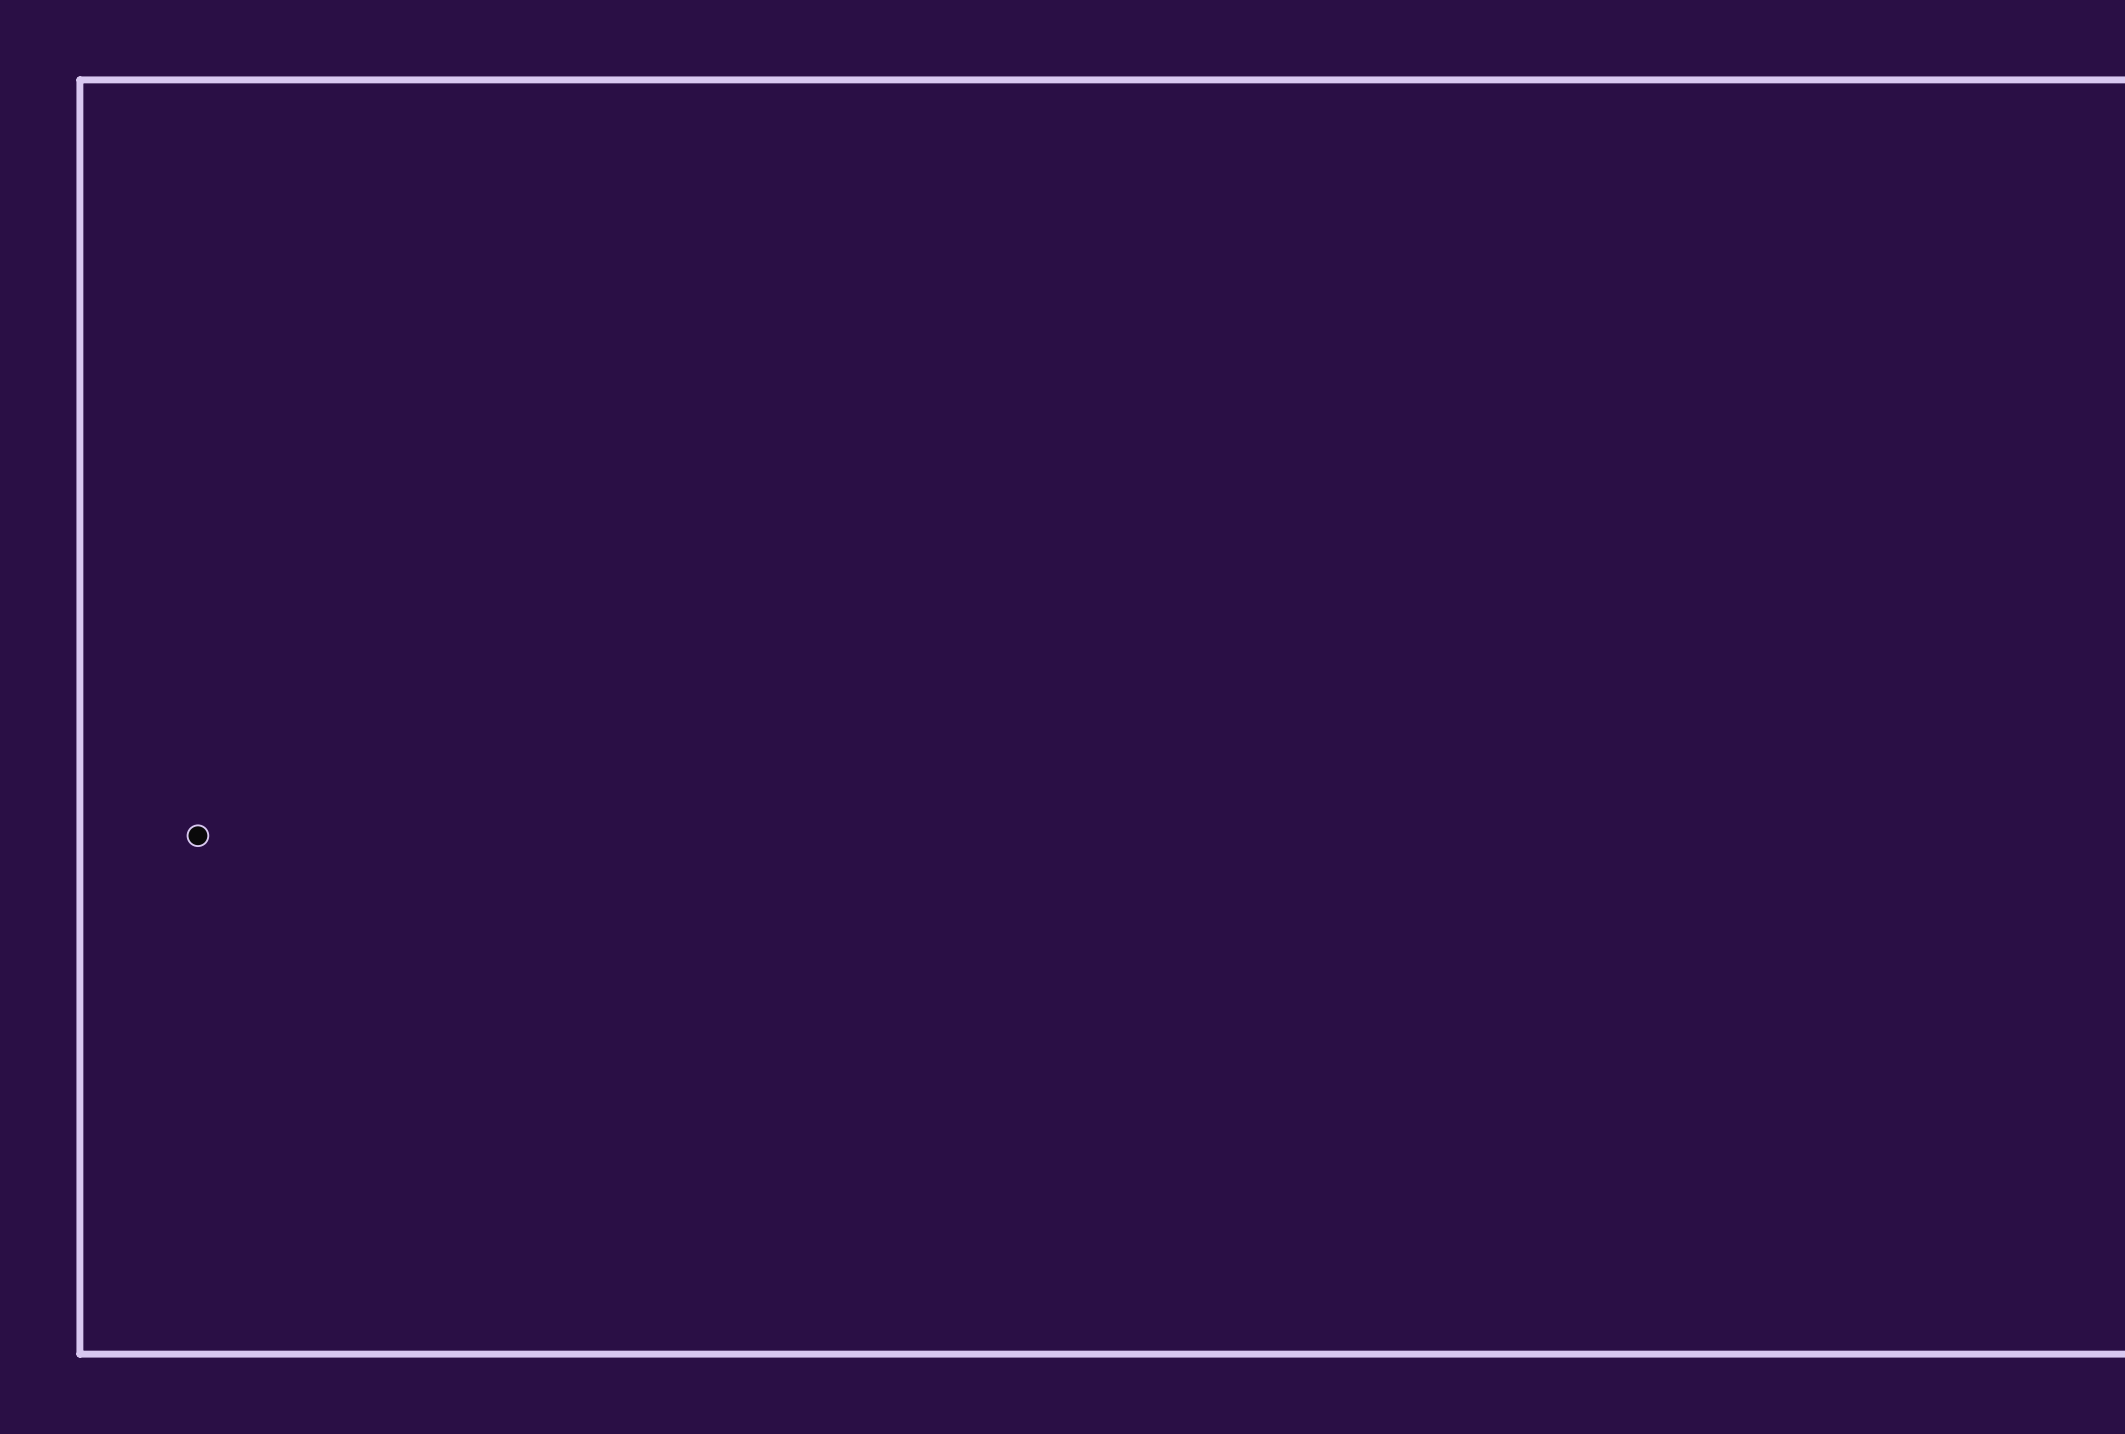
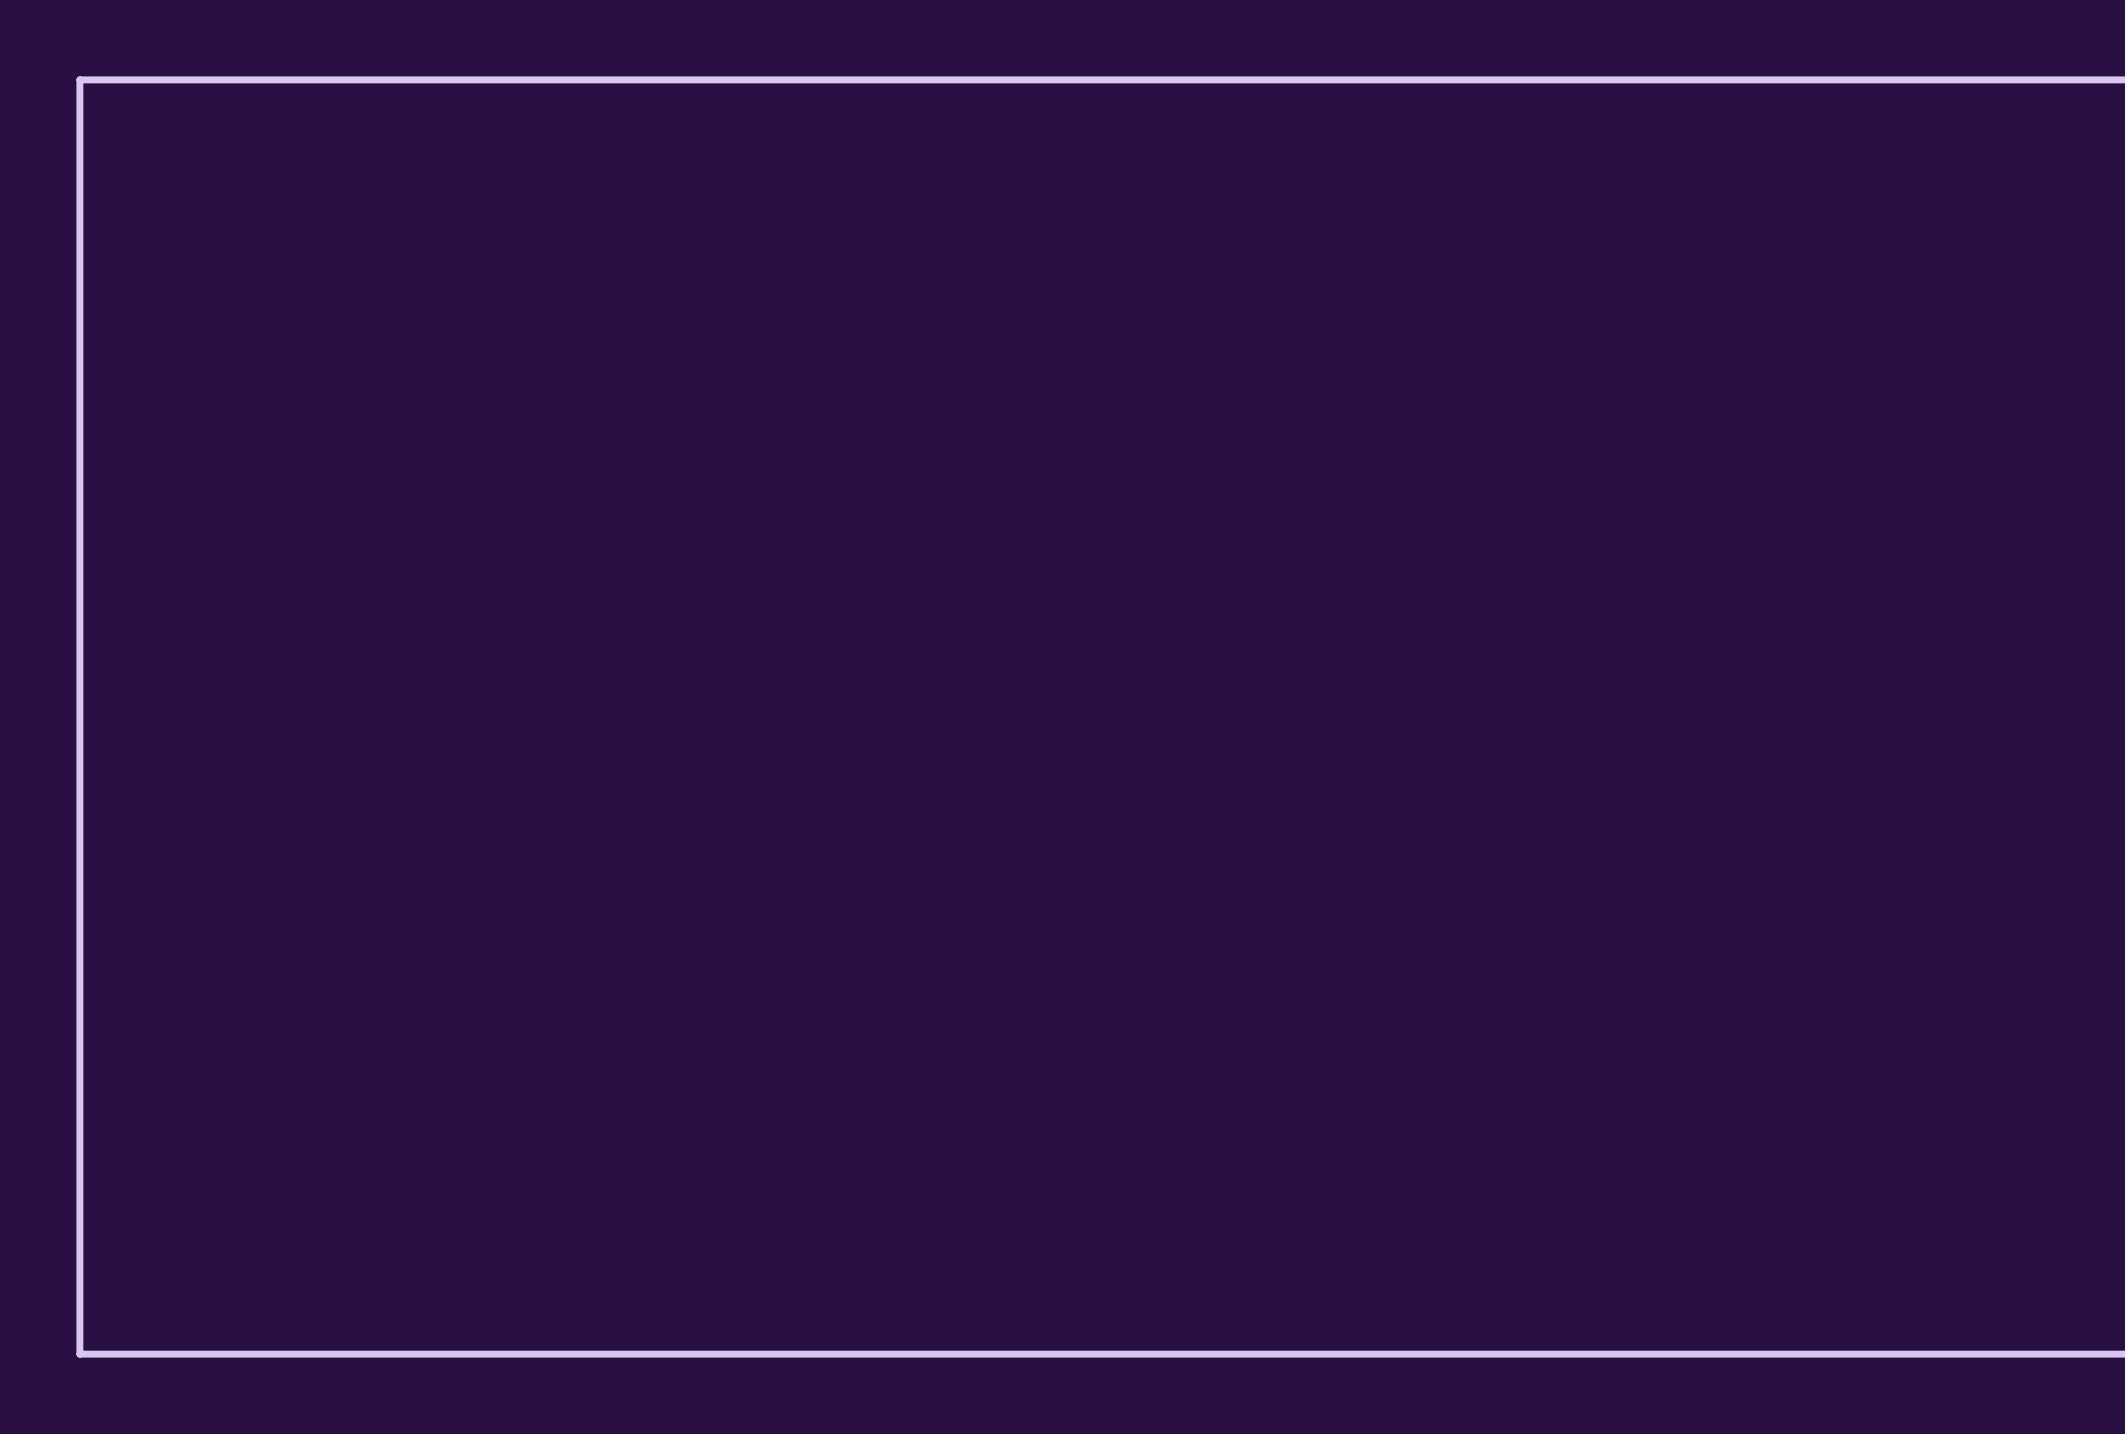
part: (197, 835) -> none

